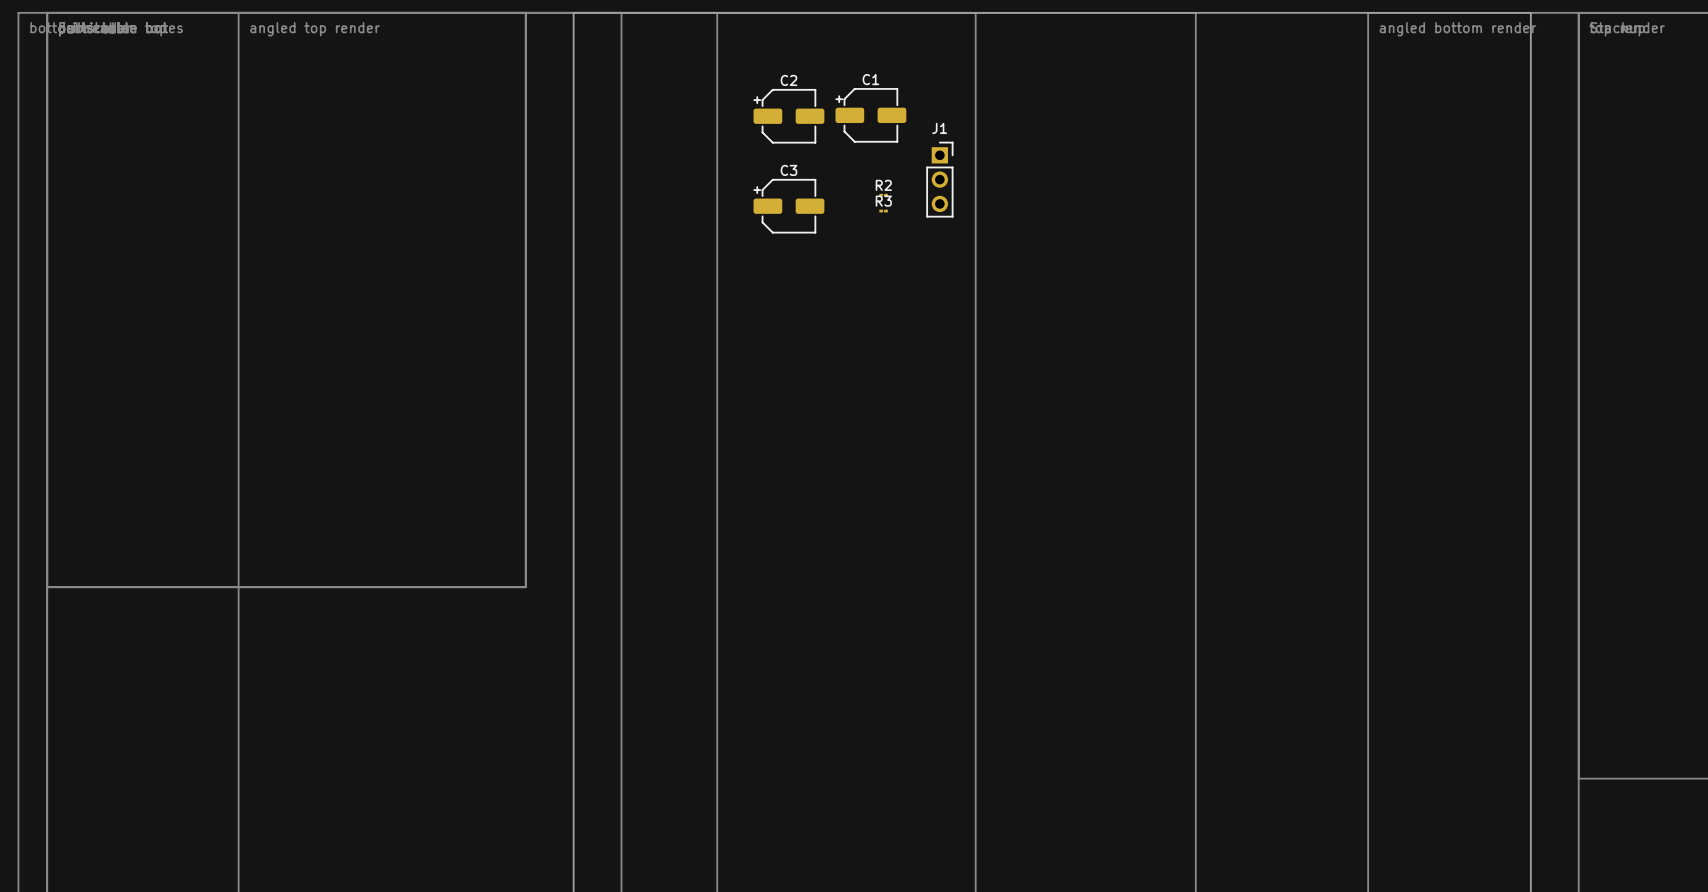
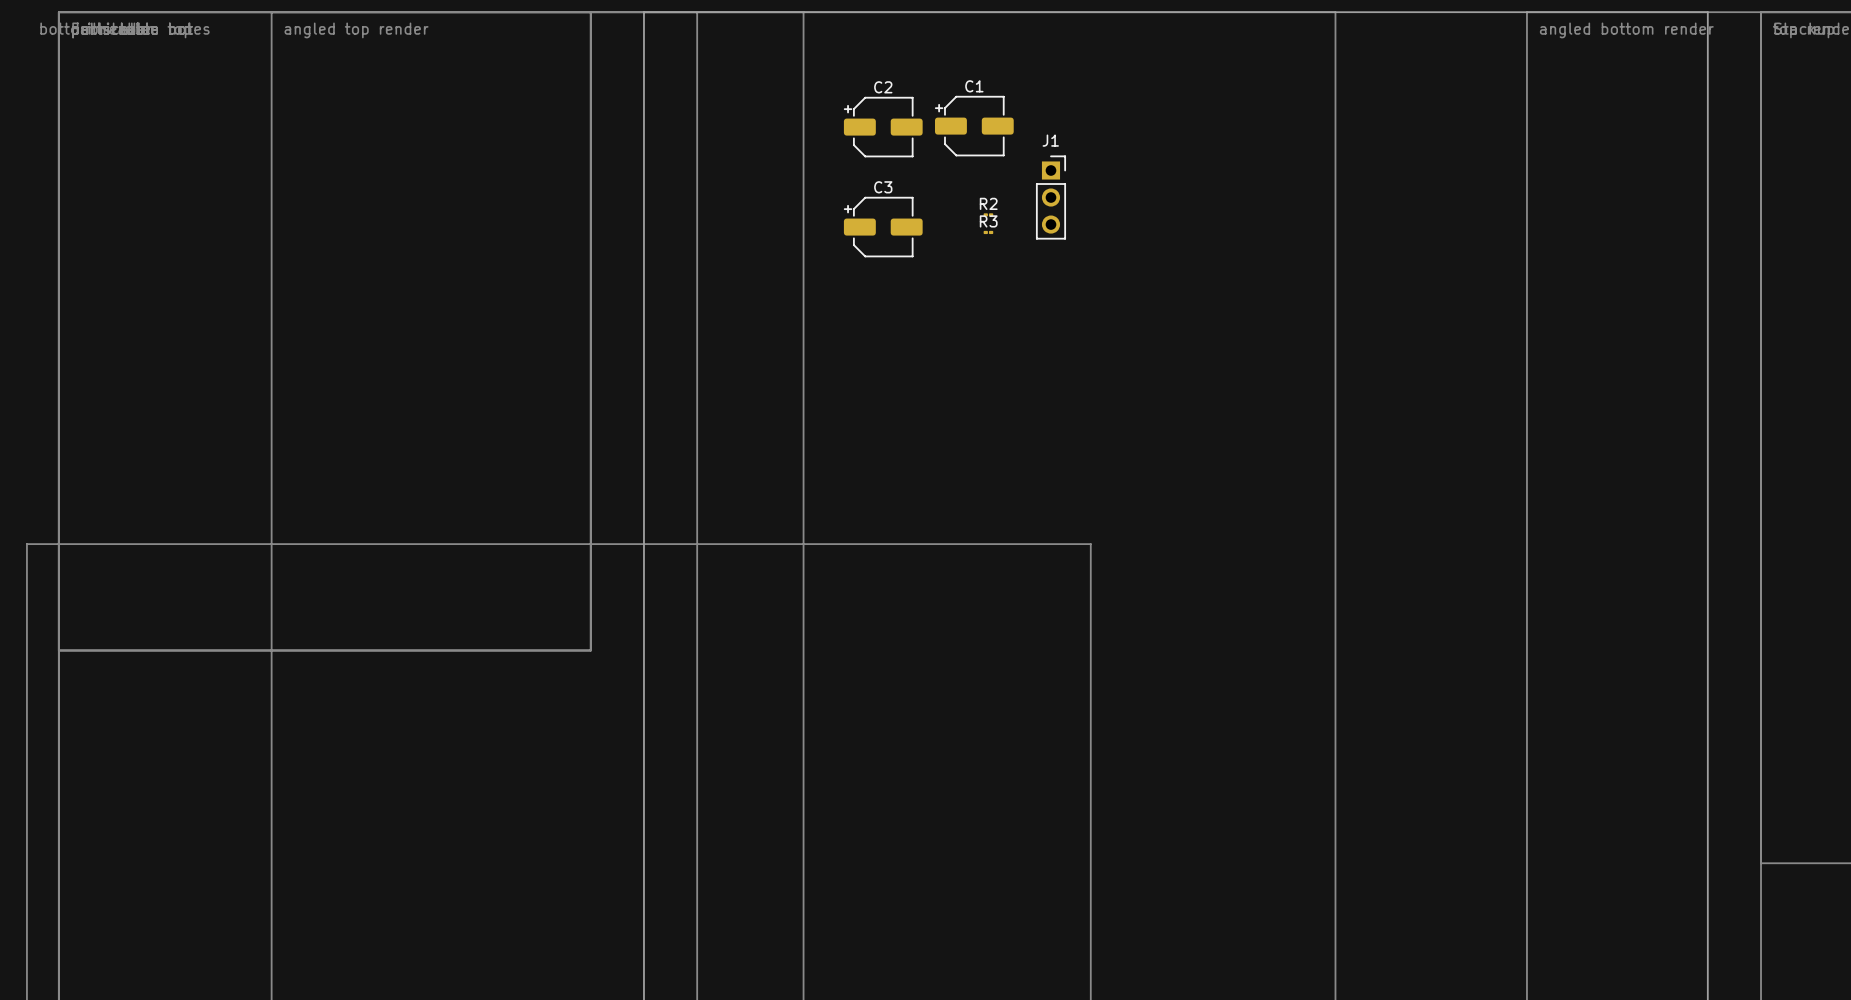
line: (47, 12) (18, 12) (18, 491) -> (1090, 544) (26, 544)
line: (975, 12) (975, 491) -> none

